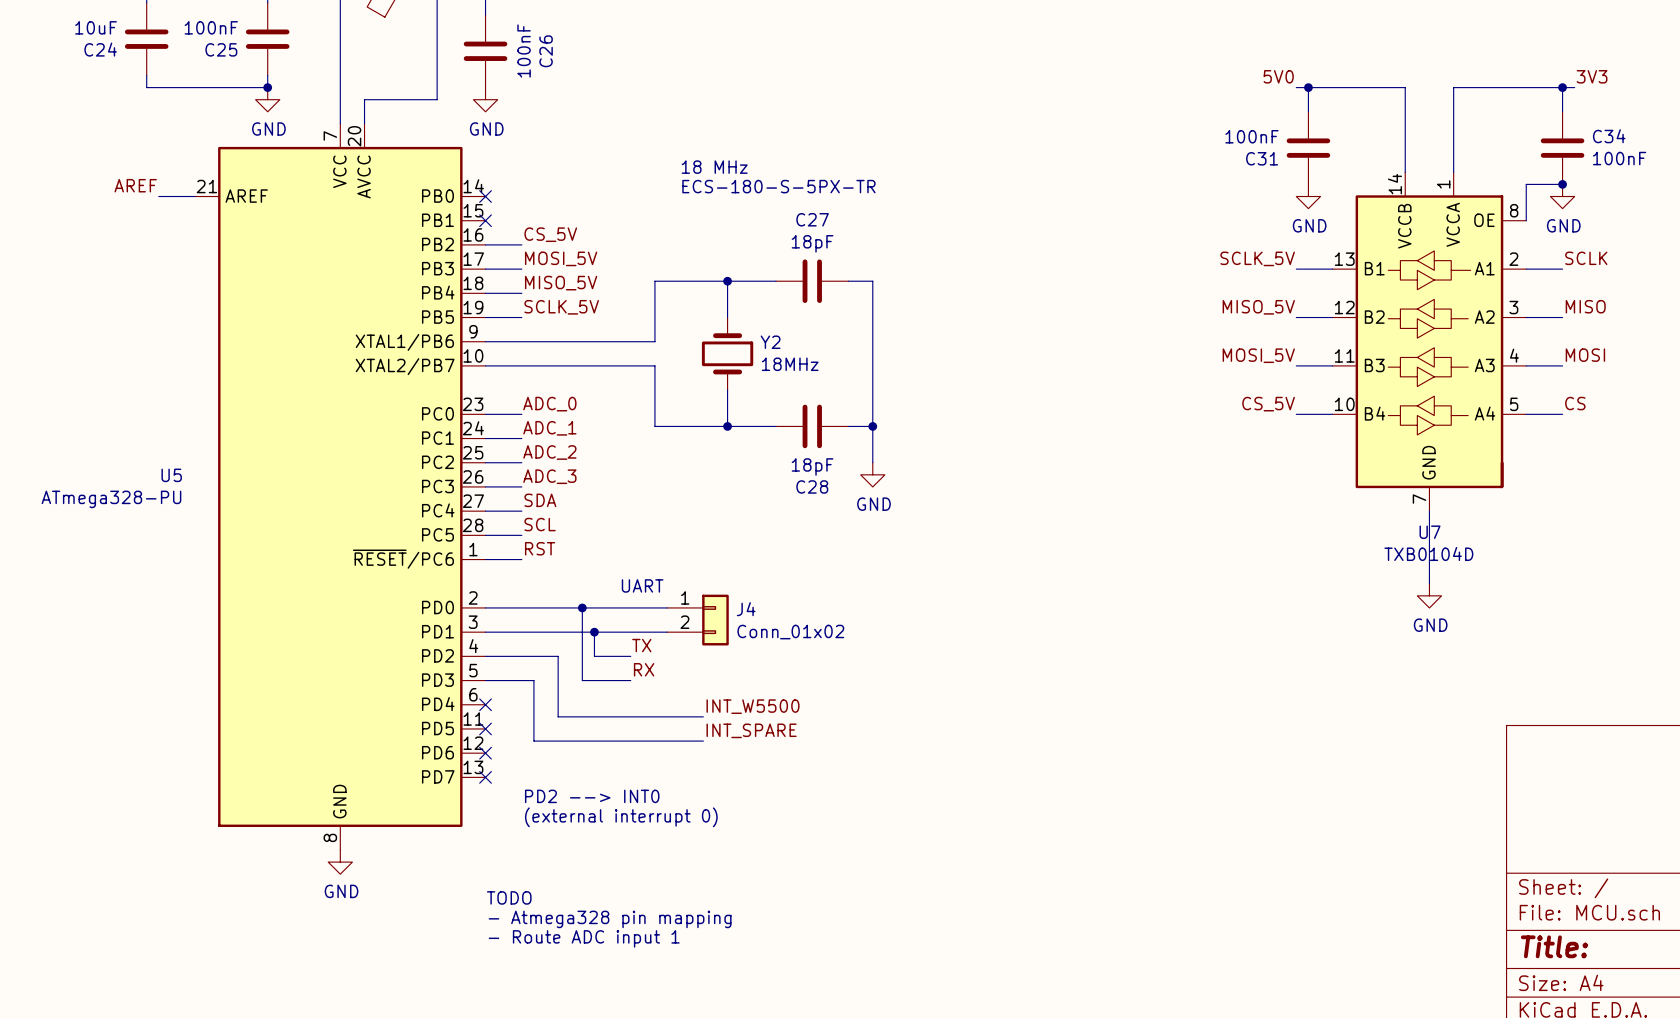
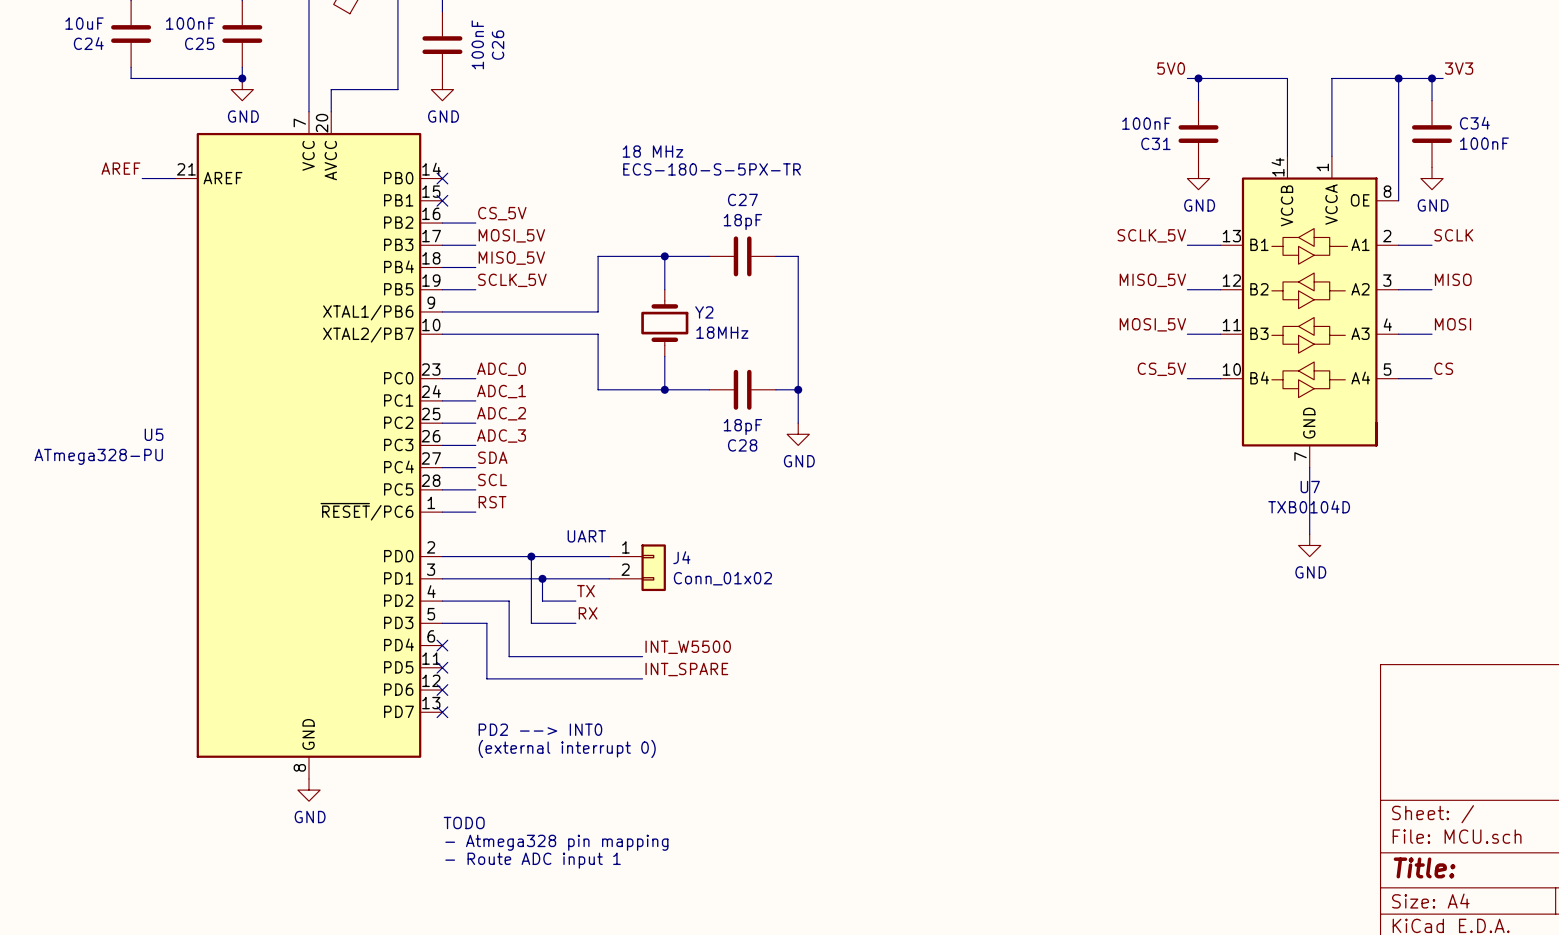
junction: none -> (1398, 78)
wire: (1526, 184) (1562, 184) -> (1398, 167) (1398, 78)
junction: (1562, 184) -> none

